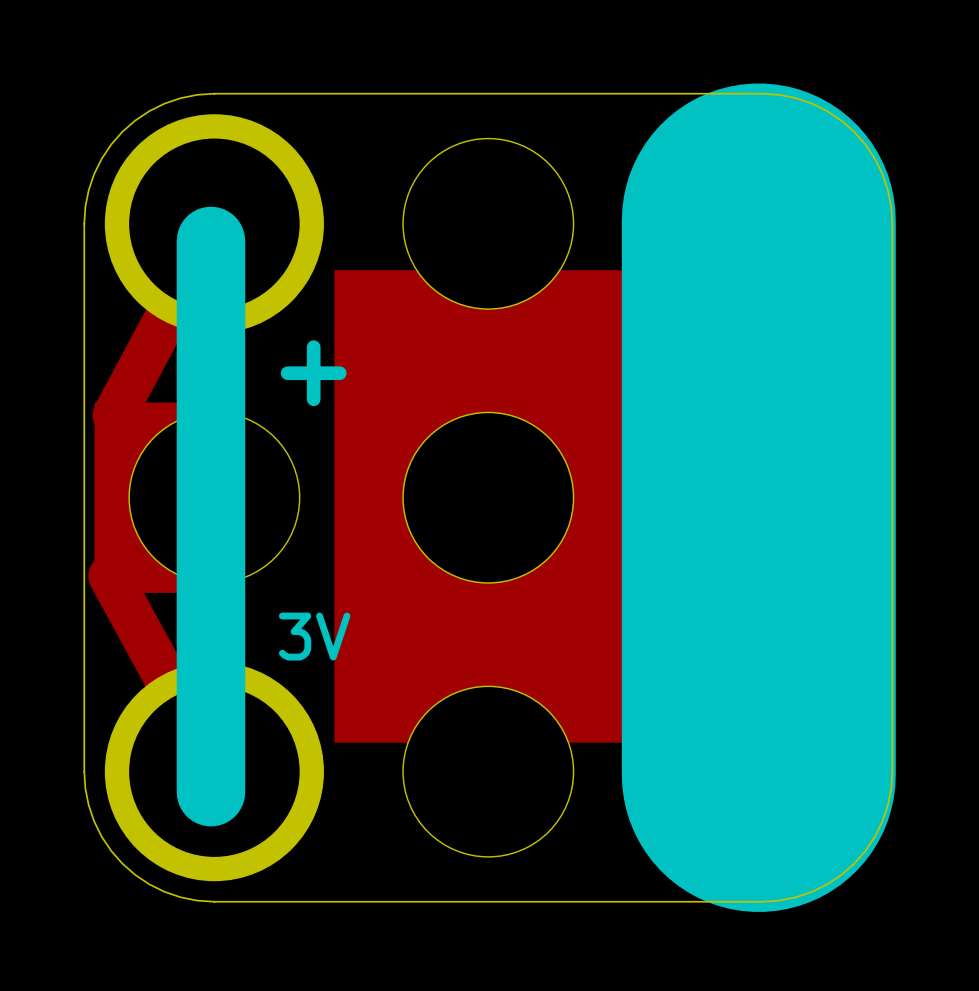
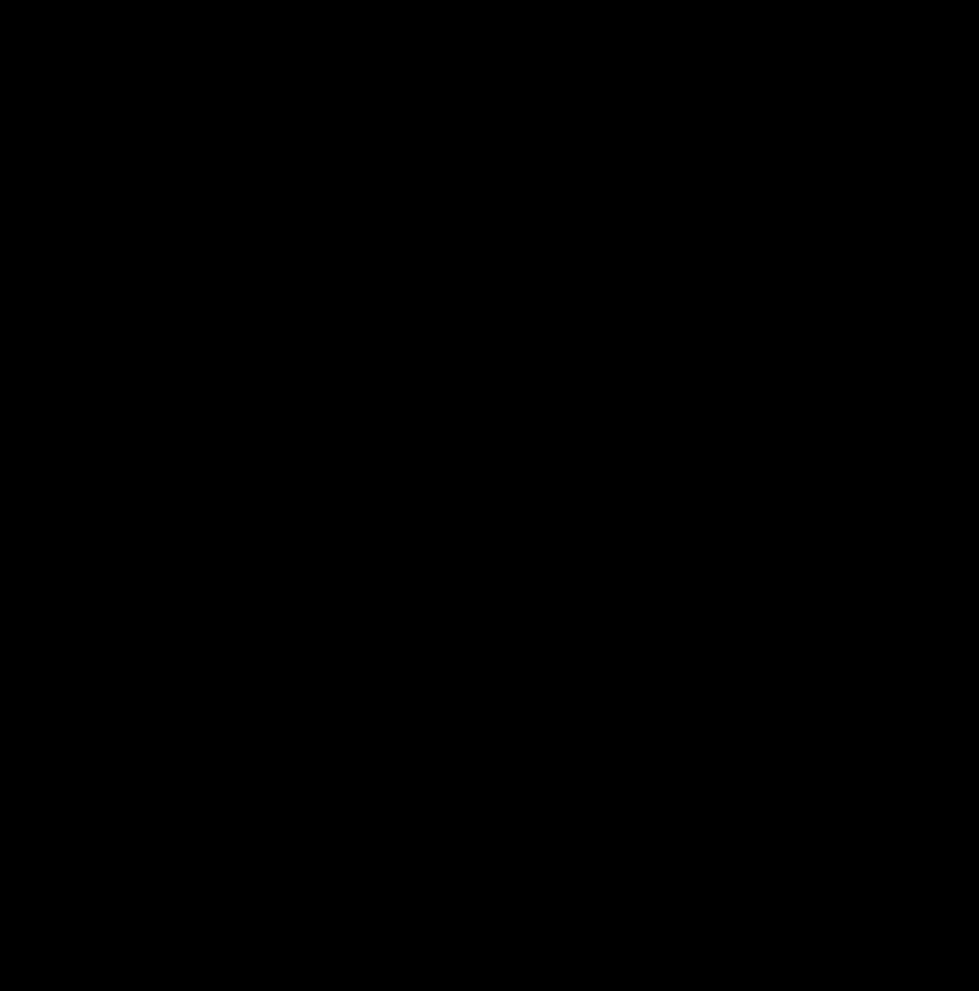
part: (489, 497) -> none

